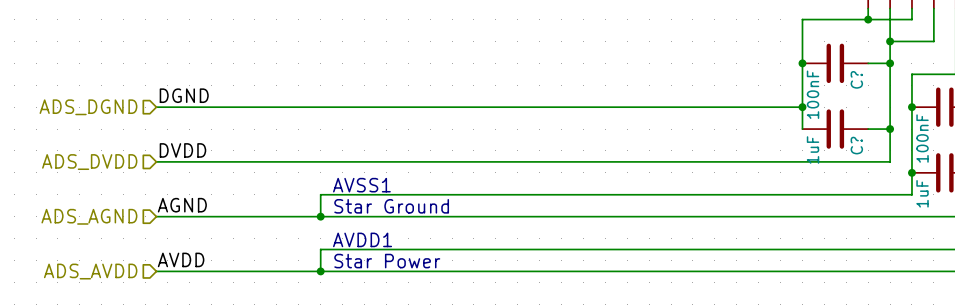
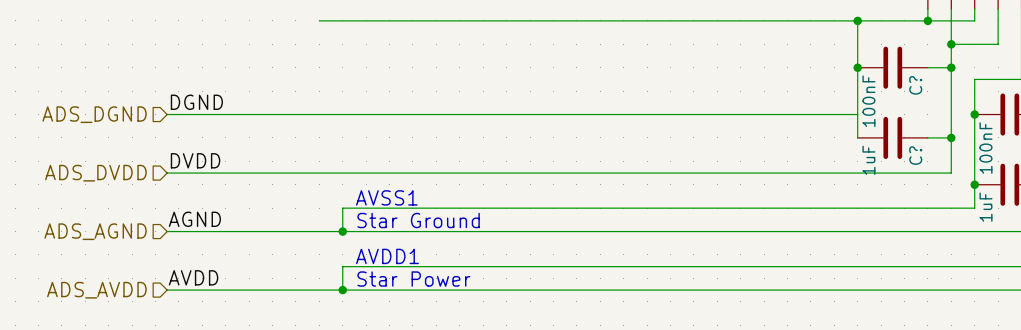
wire: none -> (319, 20) (857, 20)
junction: none -> (857, 20)
junction: (802, 107) -> none

